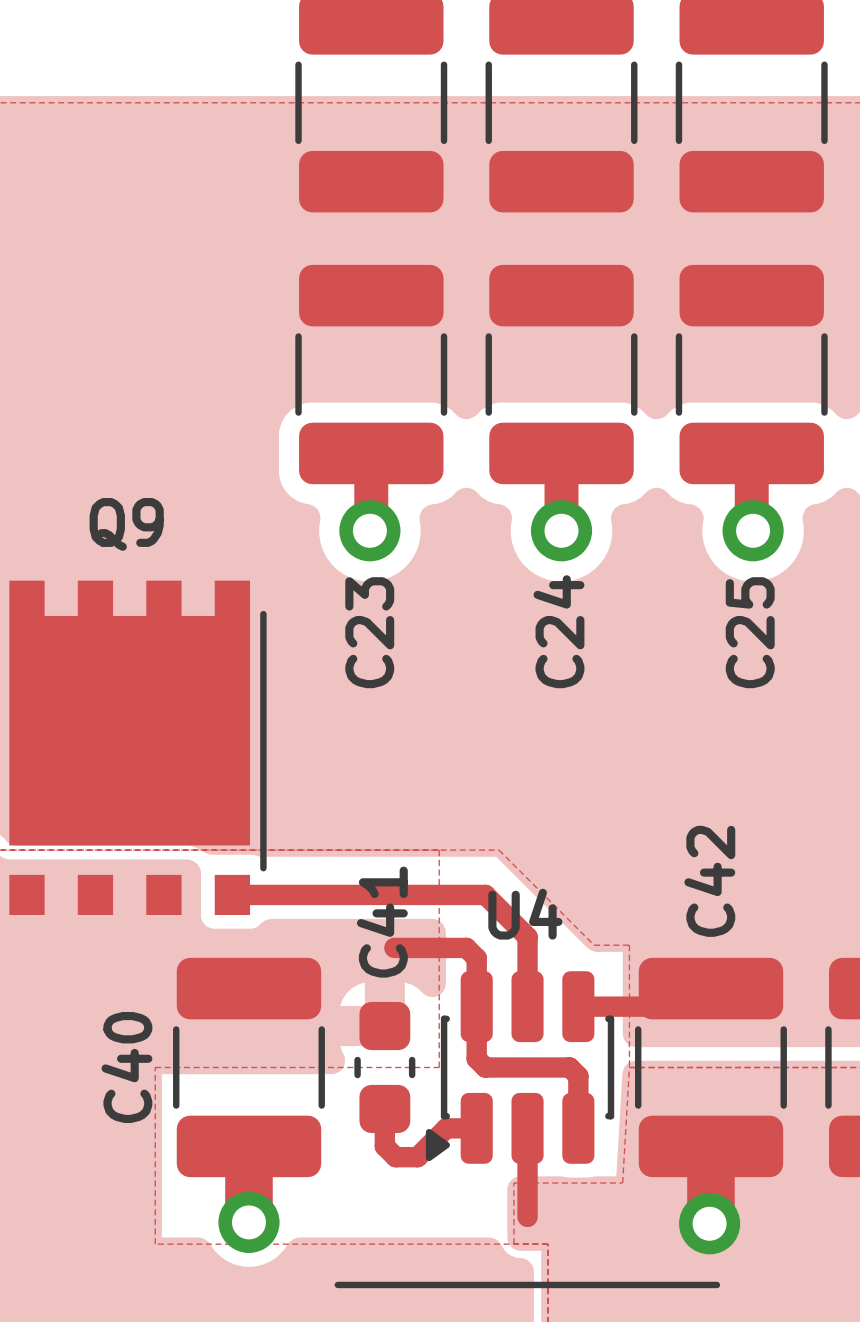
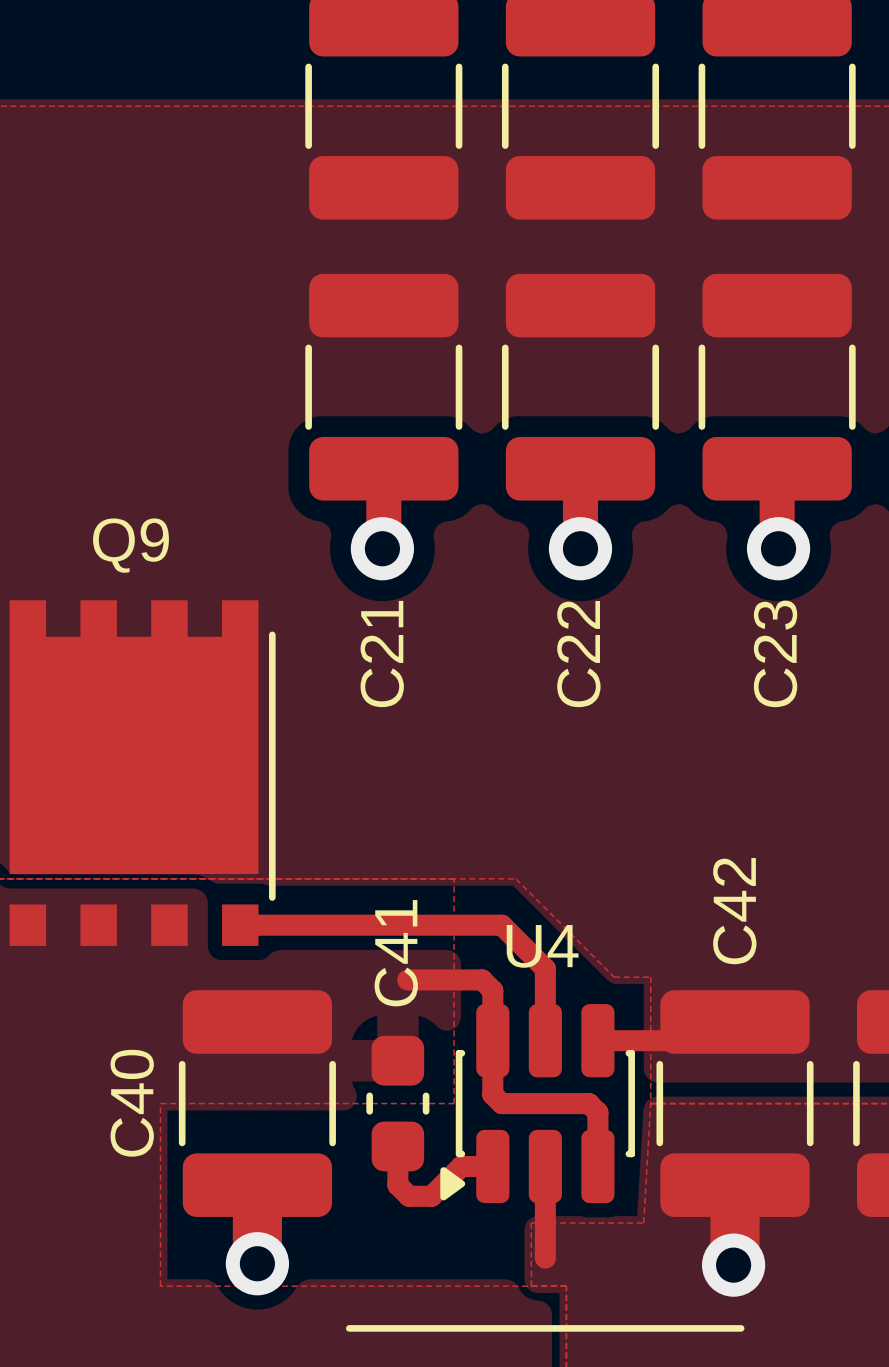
C24 name: C24 (559, 631) -> C22 (578, 654)
C23 name: C23 (369, 632) -> C21 (382, 654)
C25 name: C25 (750, 632) -> C23 (775, 653)

